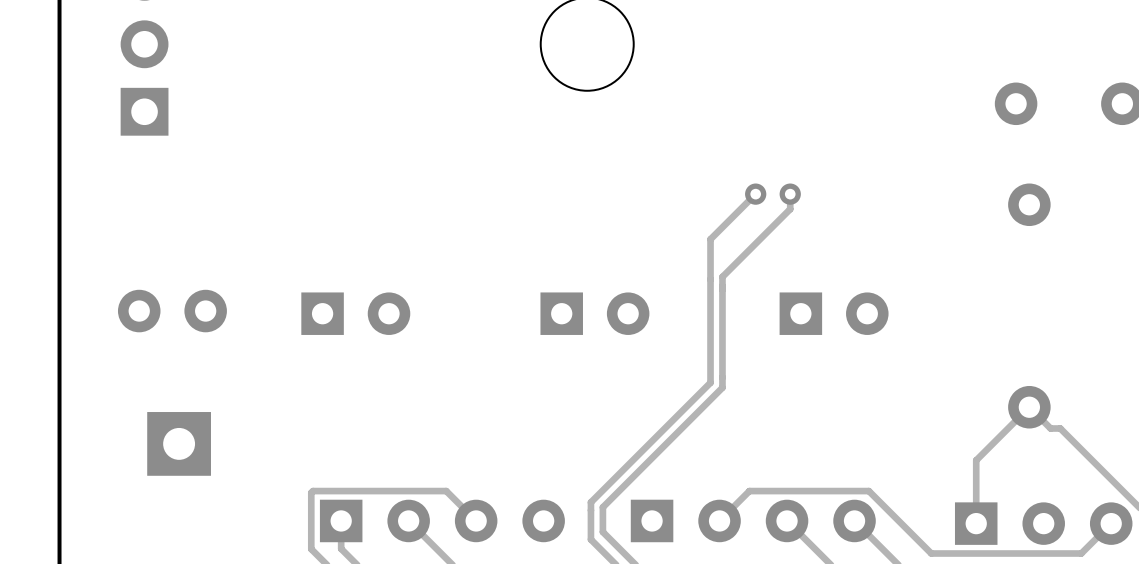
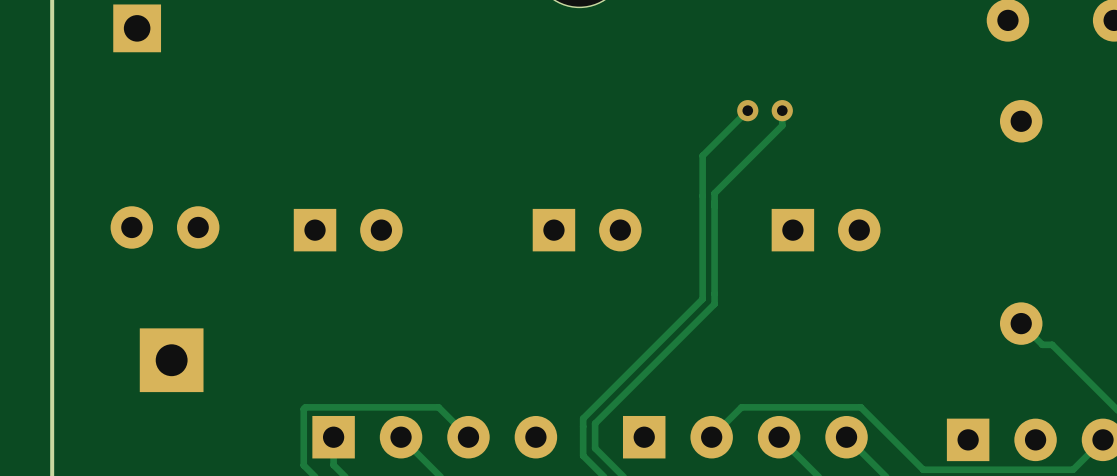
track: (1029, 407) (976, 460) (976, 523) -> none

